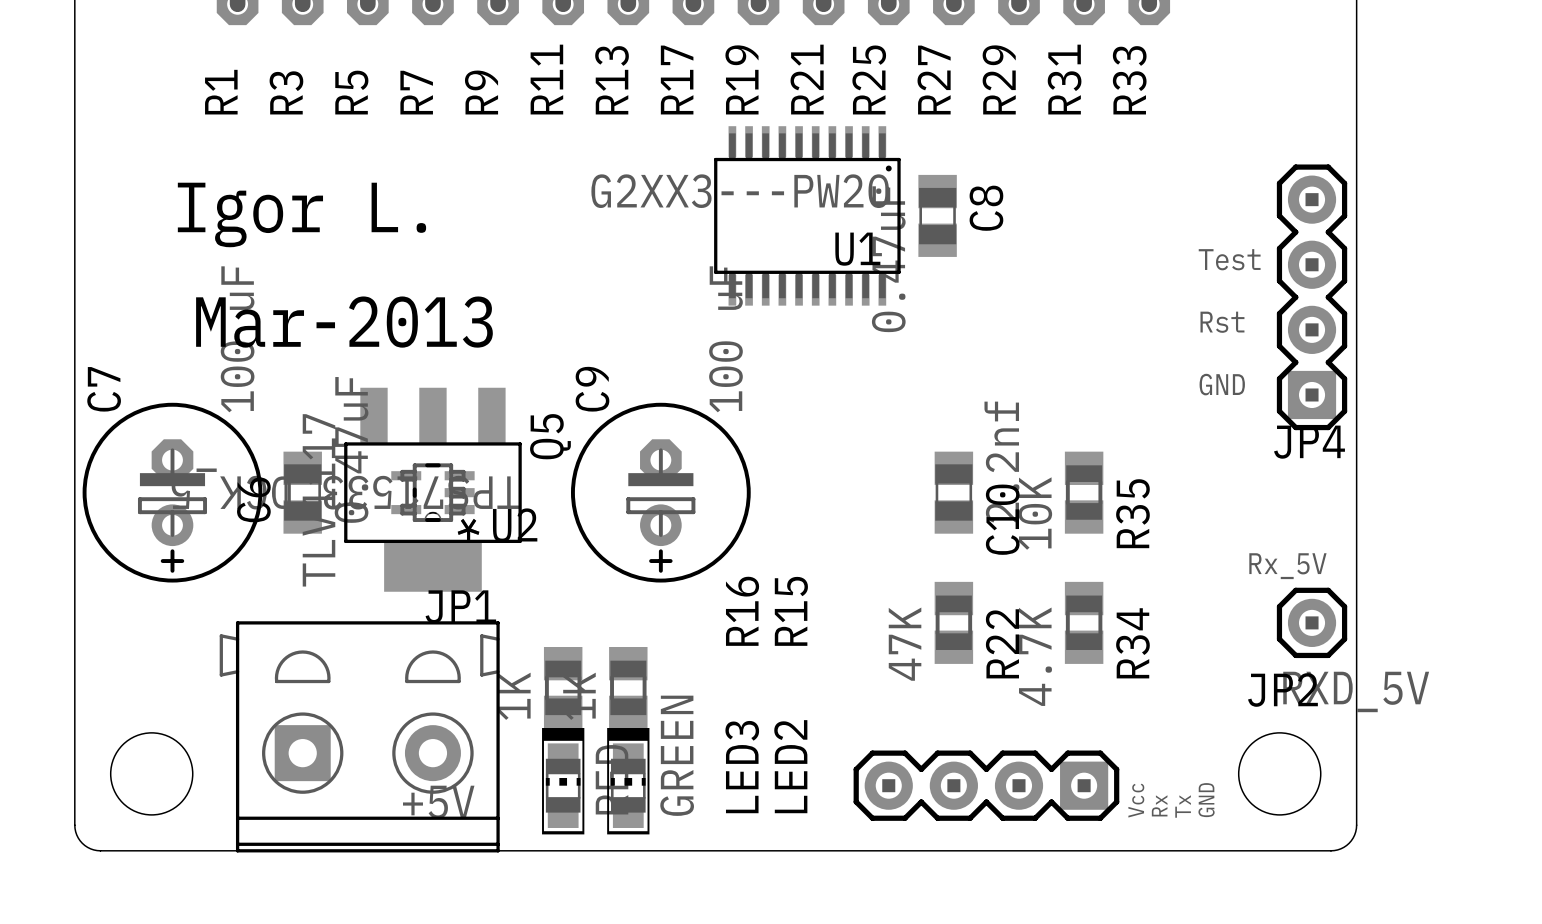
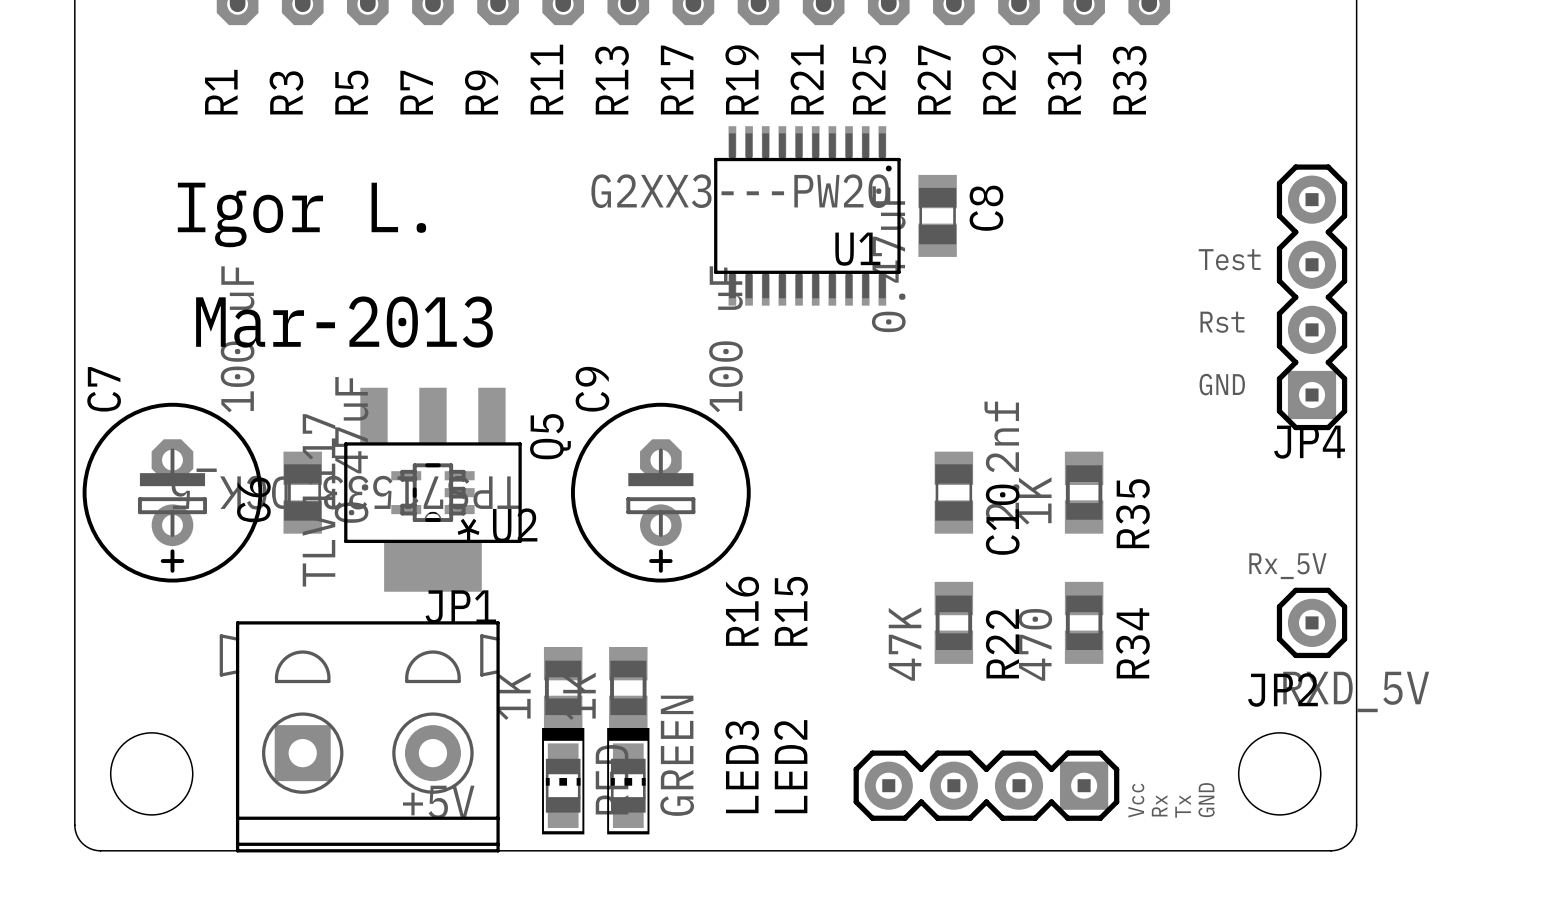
R35 value: 10K (1035, 513) -> 1K (1035, 500)
R34 value: 4.7K (1035, 656) -> 470 (1035, 644)

